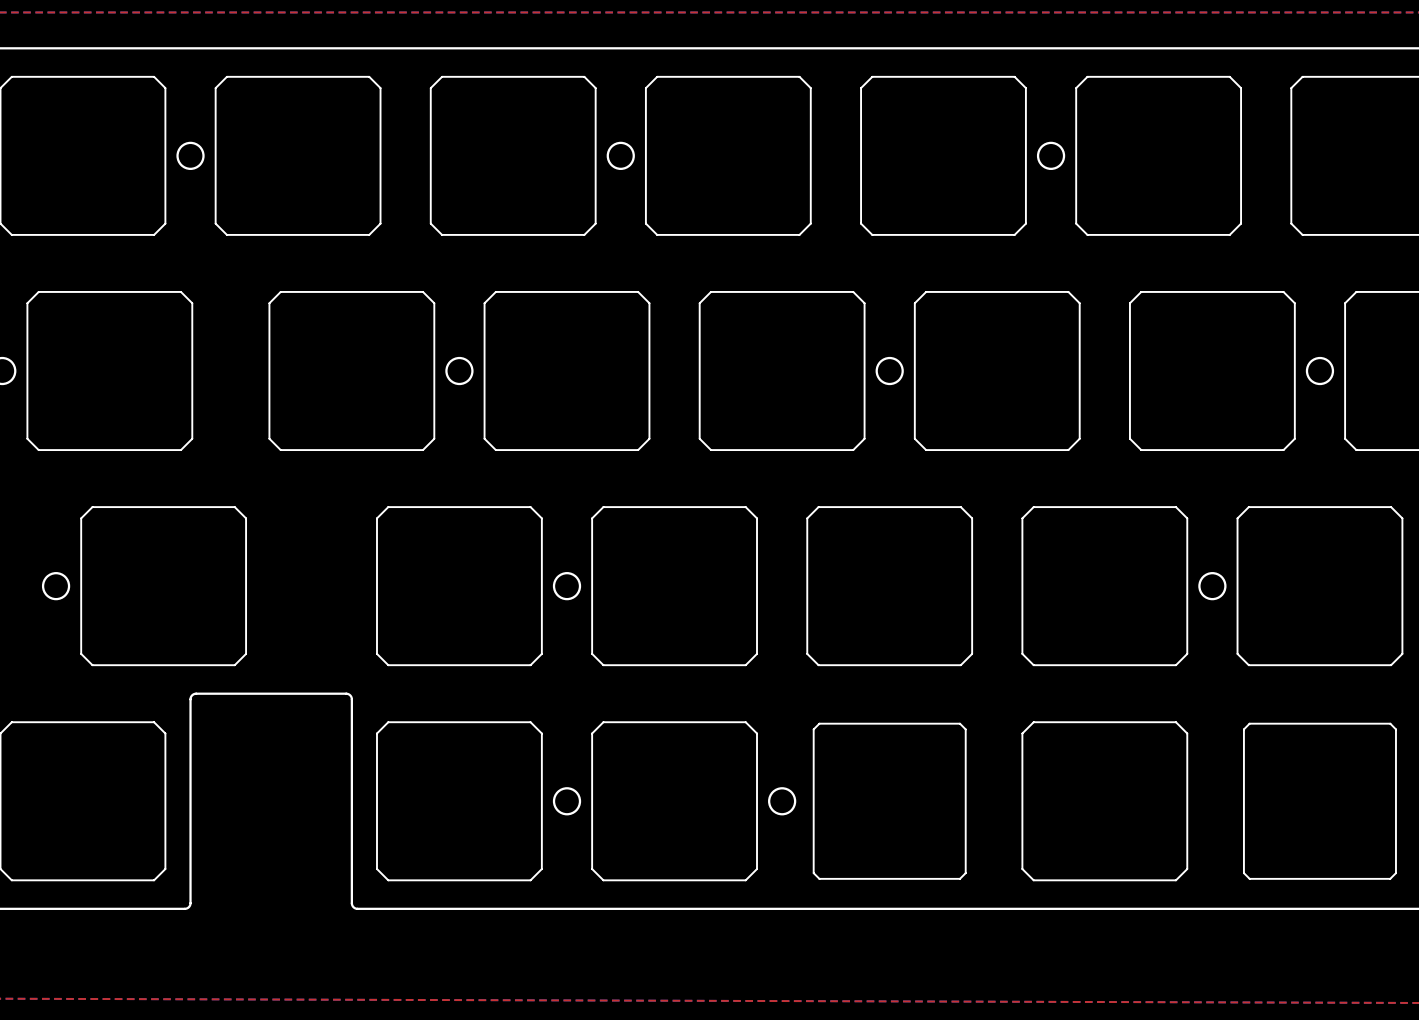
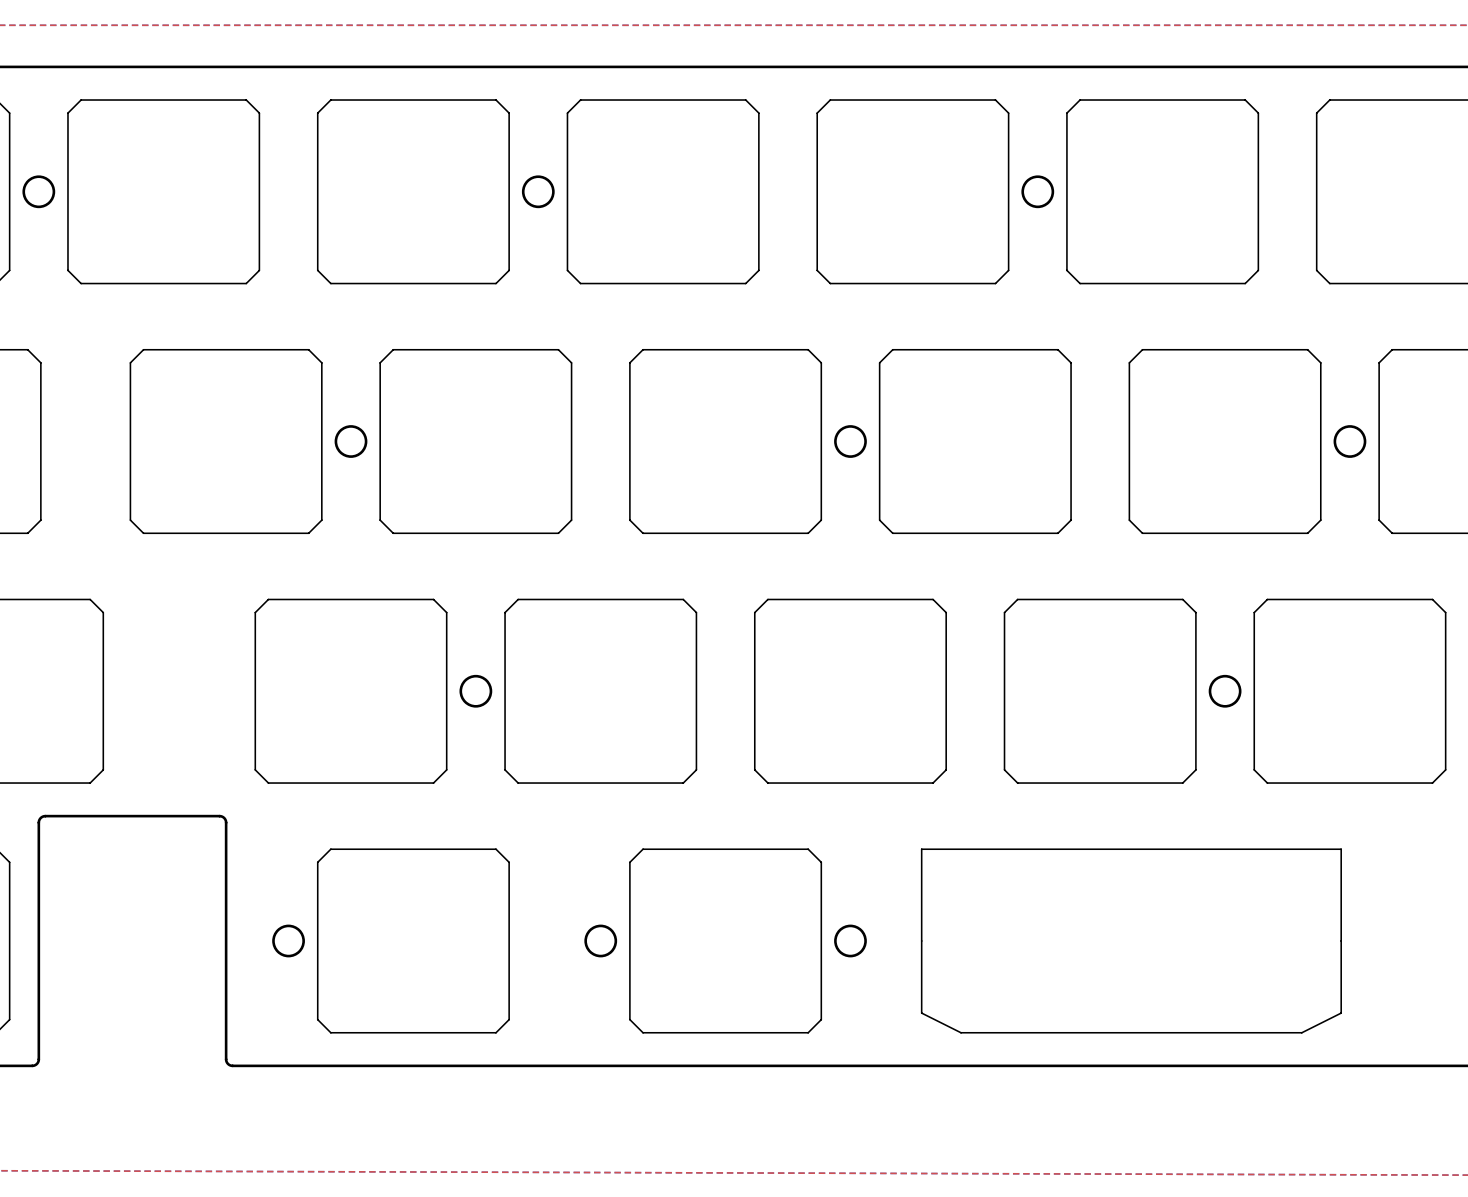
drawing: [591, 721, 758, 882] -> none
drawing: none -> [629, 848, 823, 1034]
drawing: [813, 721, 1397, 882] -> none
drawing: none -> [920, 848, 1342, 1034]
round board edge: none -> [272, 924, 305, 958]
round board edge: [552, 787, 582, 816] -> none
round board edge: none -> [584, 924, 618, 958]
round board edge: [768, 787, 797, 816] -> none
round board edge: none -> [834, 924, 867, 958]
drawing position: (459, 801) -> (413, 940)

